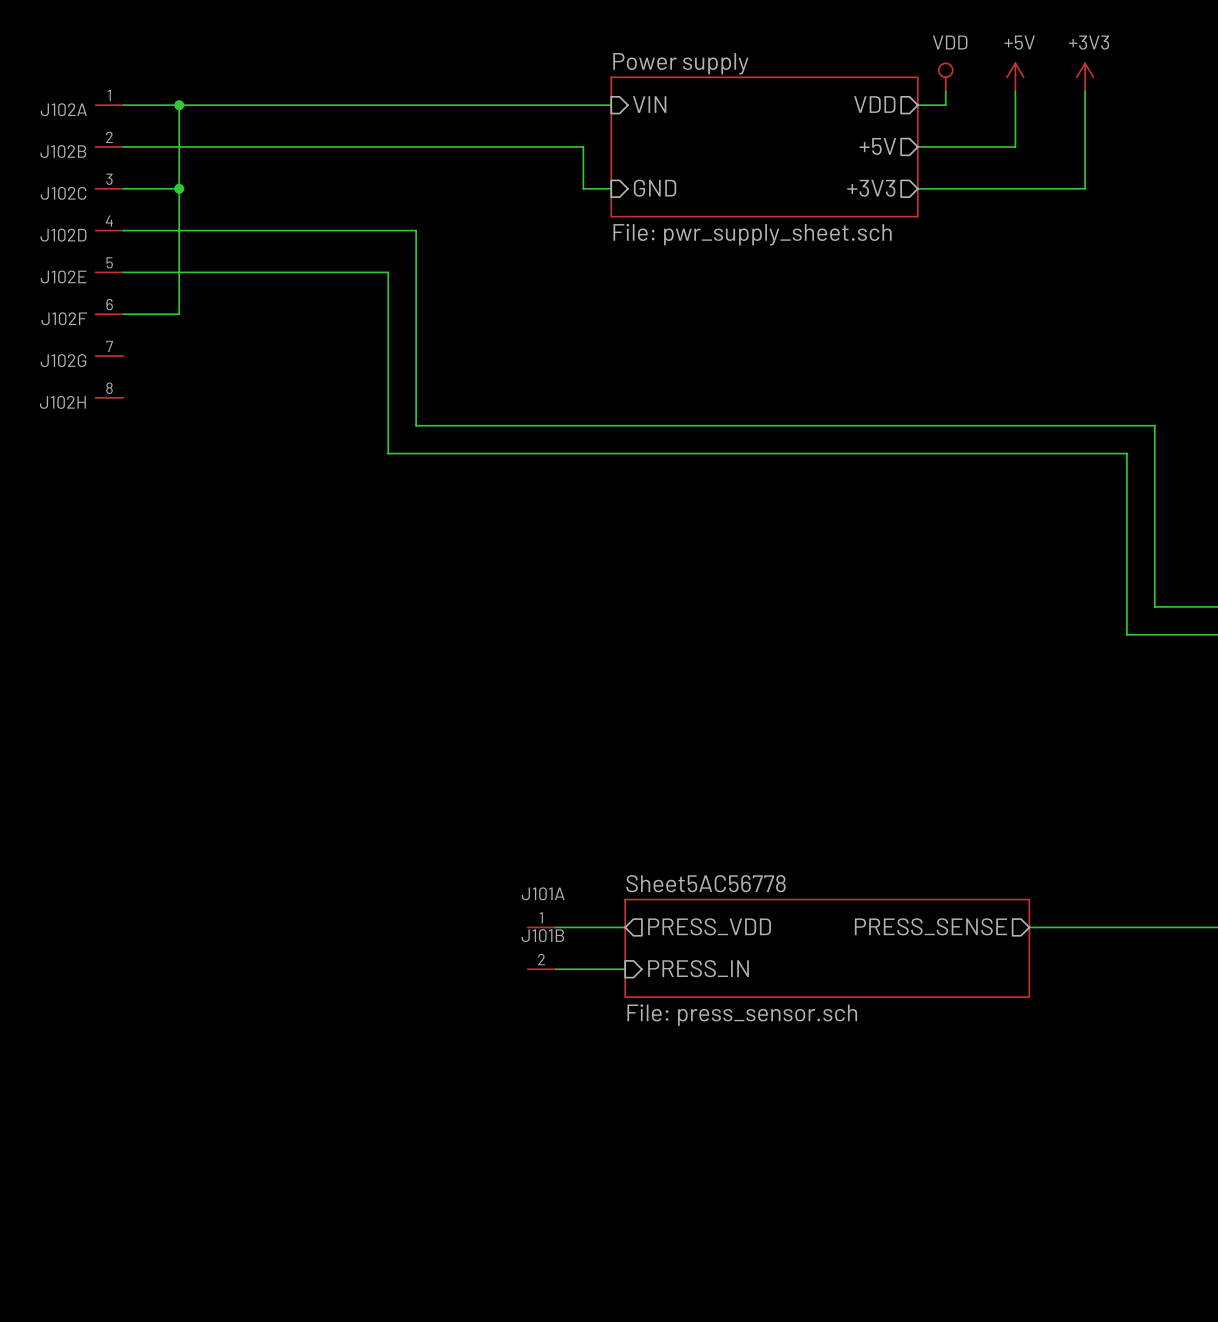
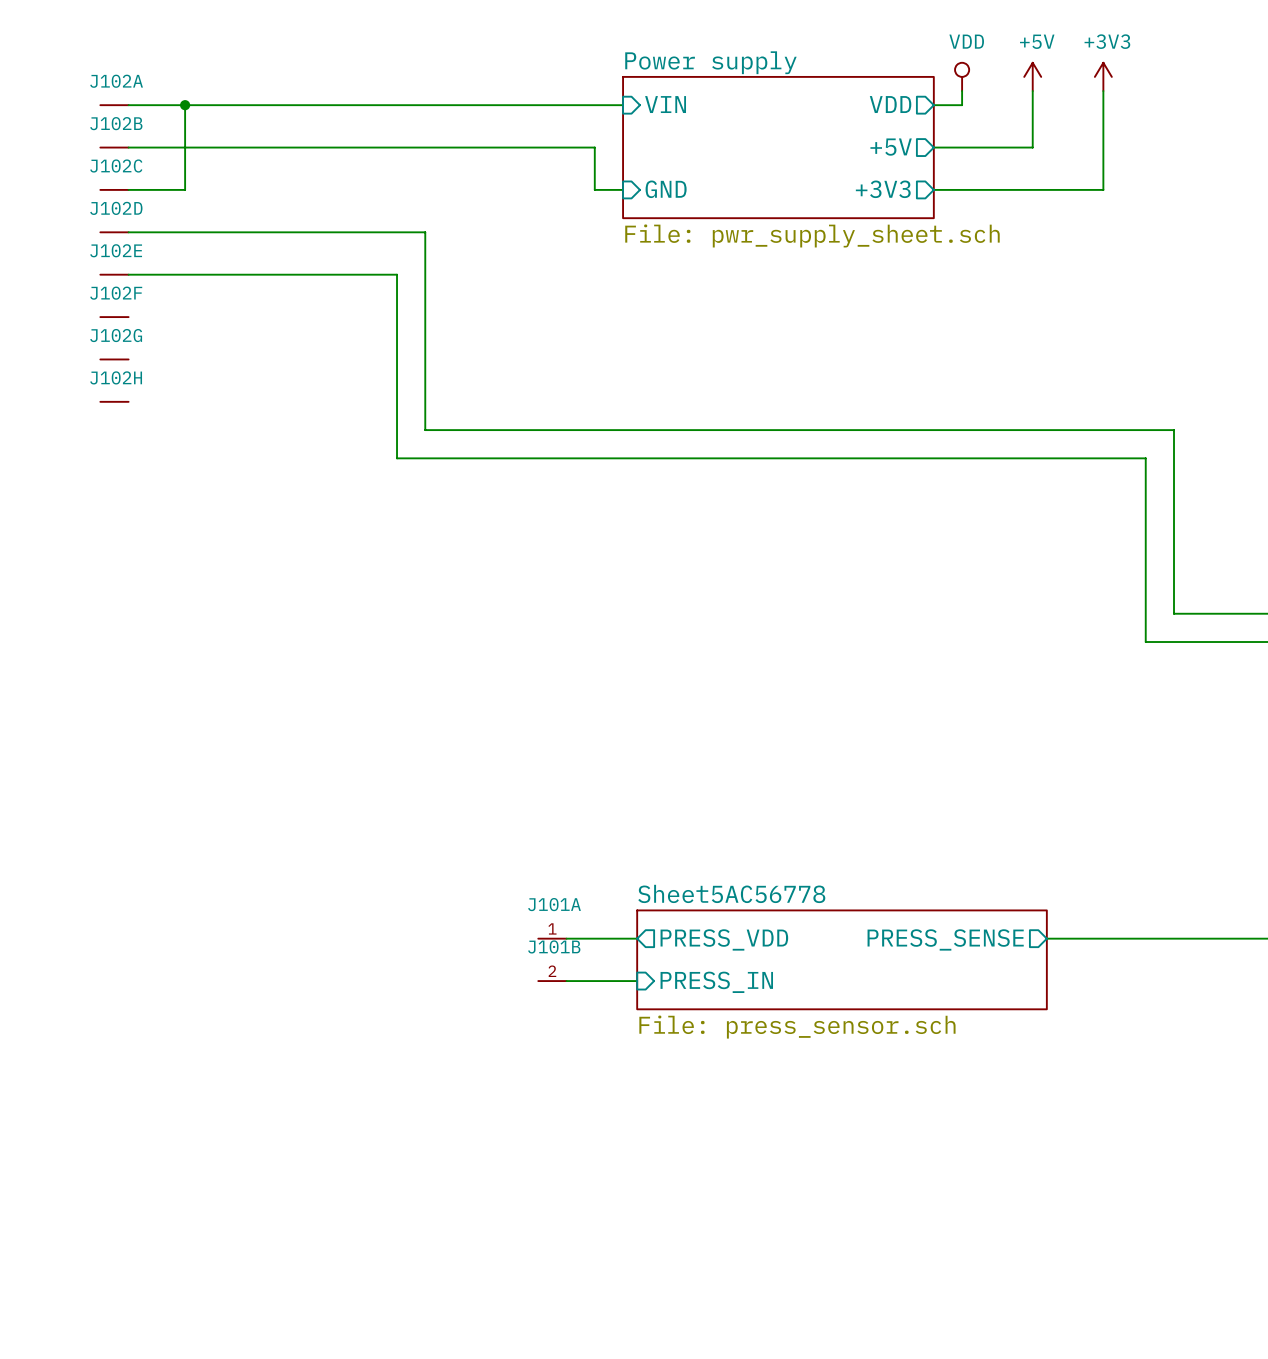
J102A pin number: 1 (109, 95) -> none
J102A name position: J102A (63, 109) -> J102A (116, 81)
J102B pin number: 2 (109, 137) -> none
J102B name position: J102B (63, 151) -> J102B (116, 123)
J102C pin number: 3 (109, 179) -> none
wire: (179, 188) (179, 314) (123, 314) -> none
junction: (179, 188) -> none
J102C name position: J102C (63, 193) -> J102C (116, 166)
J102D pin number: 4 (109, 221) -> none
J102D name position: J102D (63, 235) -> J102D (116, 208)
J102E pin number: 5 (109, 262) -> none
J102E name position: J102E (63, 276) -> J102E (116, 250)
J102F pin number: 6 (109, 304) -> none
J102F name position: J102F (64, 318) -> J102F (116, 293)
J102G pin number: 7 (109, 346) -> none
J102G name position: J102G (63, 360) -> J102G (116, 335)
J102H pin number: 8 (109, 388) -> none
J102H name position: J102H (62, 402) -> J102H (116, 377)

